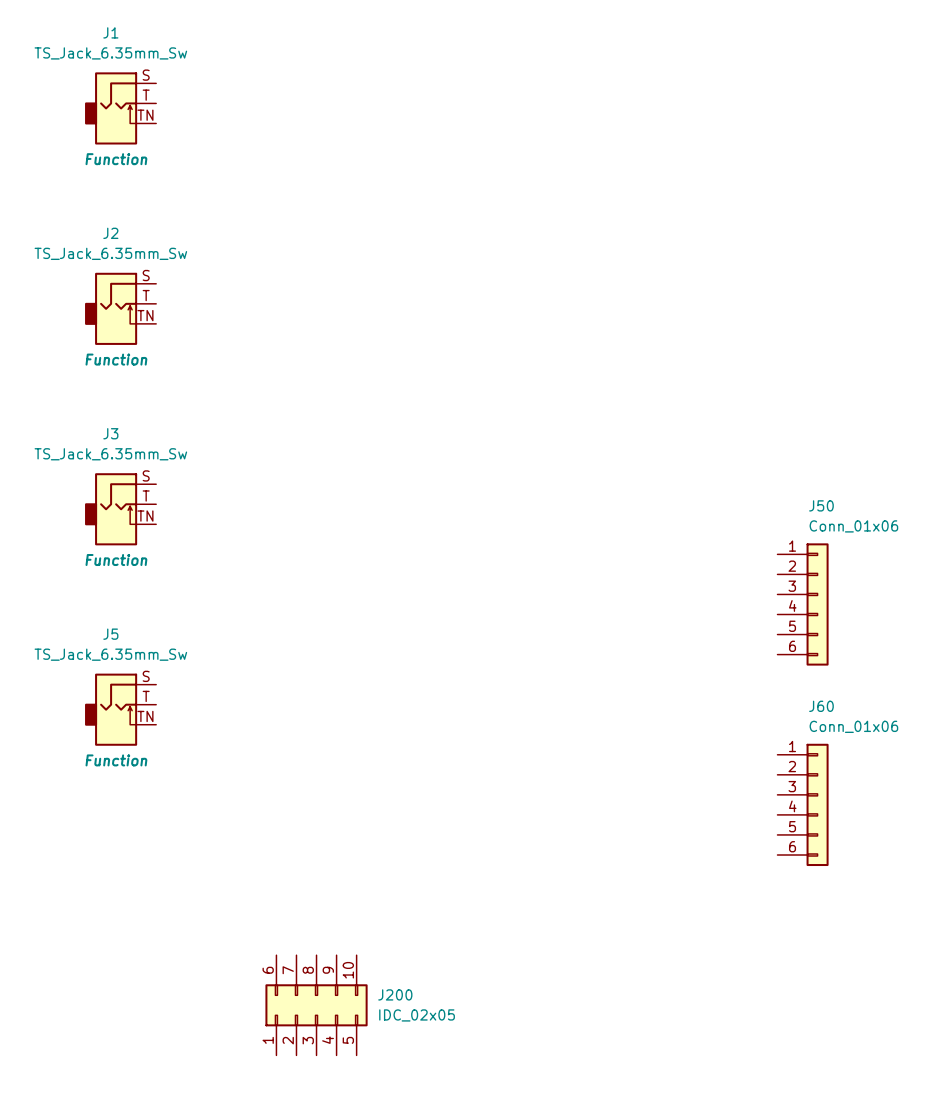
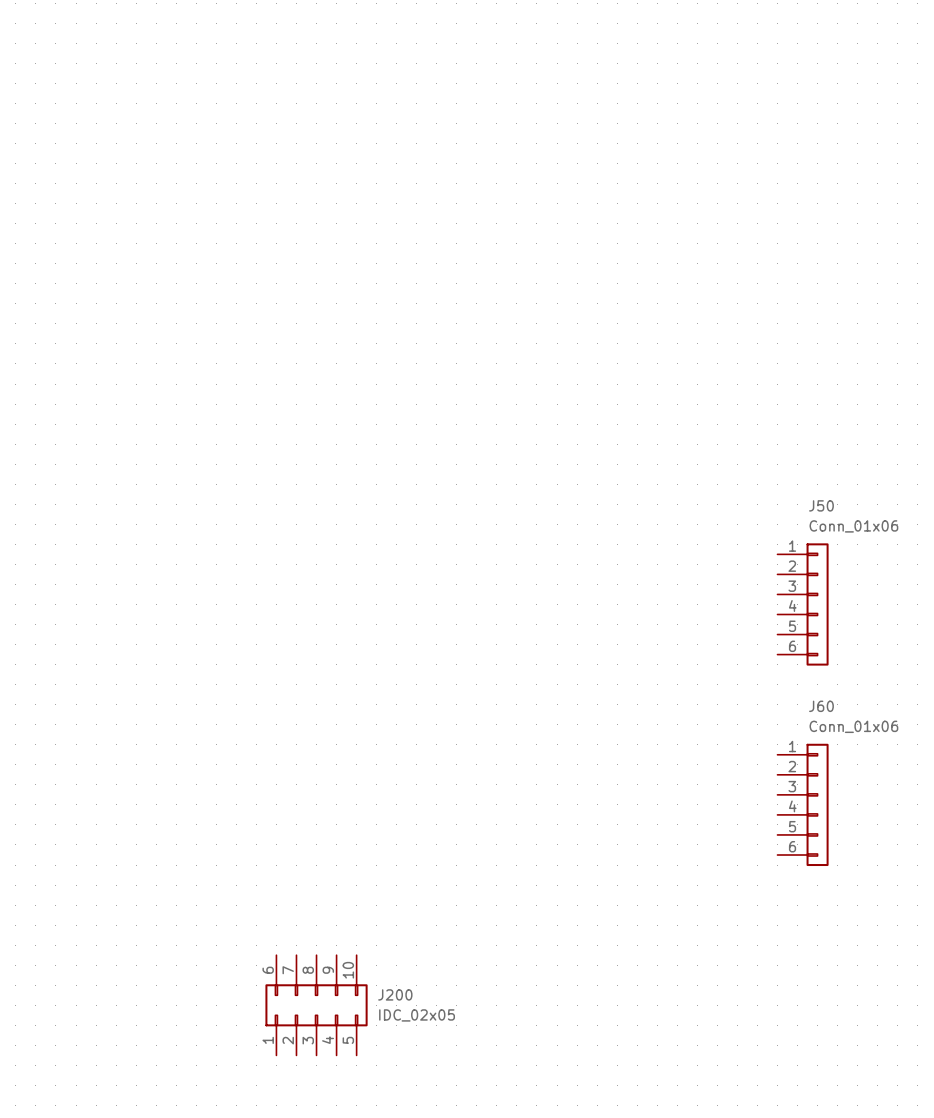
J1: TS_Jack_6.35mm_Sw (120, 108) -> none
J2: TS_Jack_6.35mm_Sw (120, 308) -> none
J3: TS_Jack_6.35mm_Sw (120, 509) -> none
J5: TS_Jack_6.35mm_Sw (120, 709) -> none

